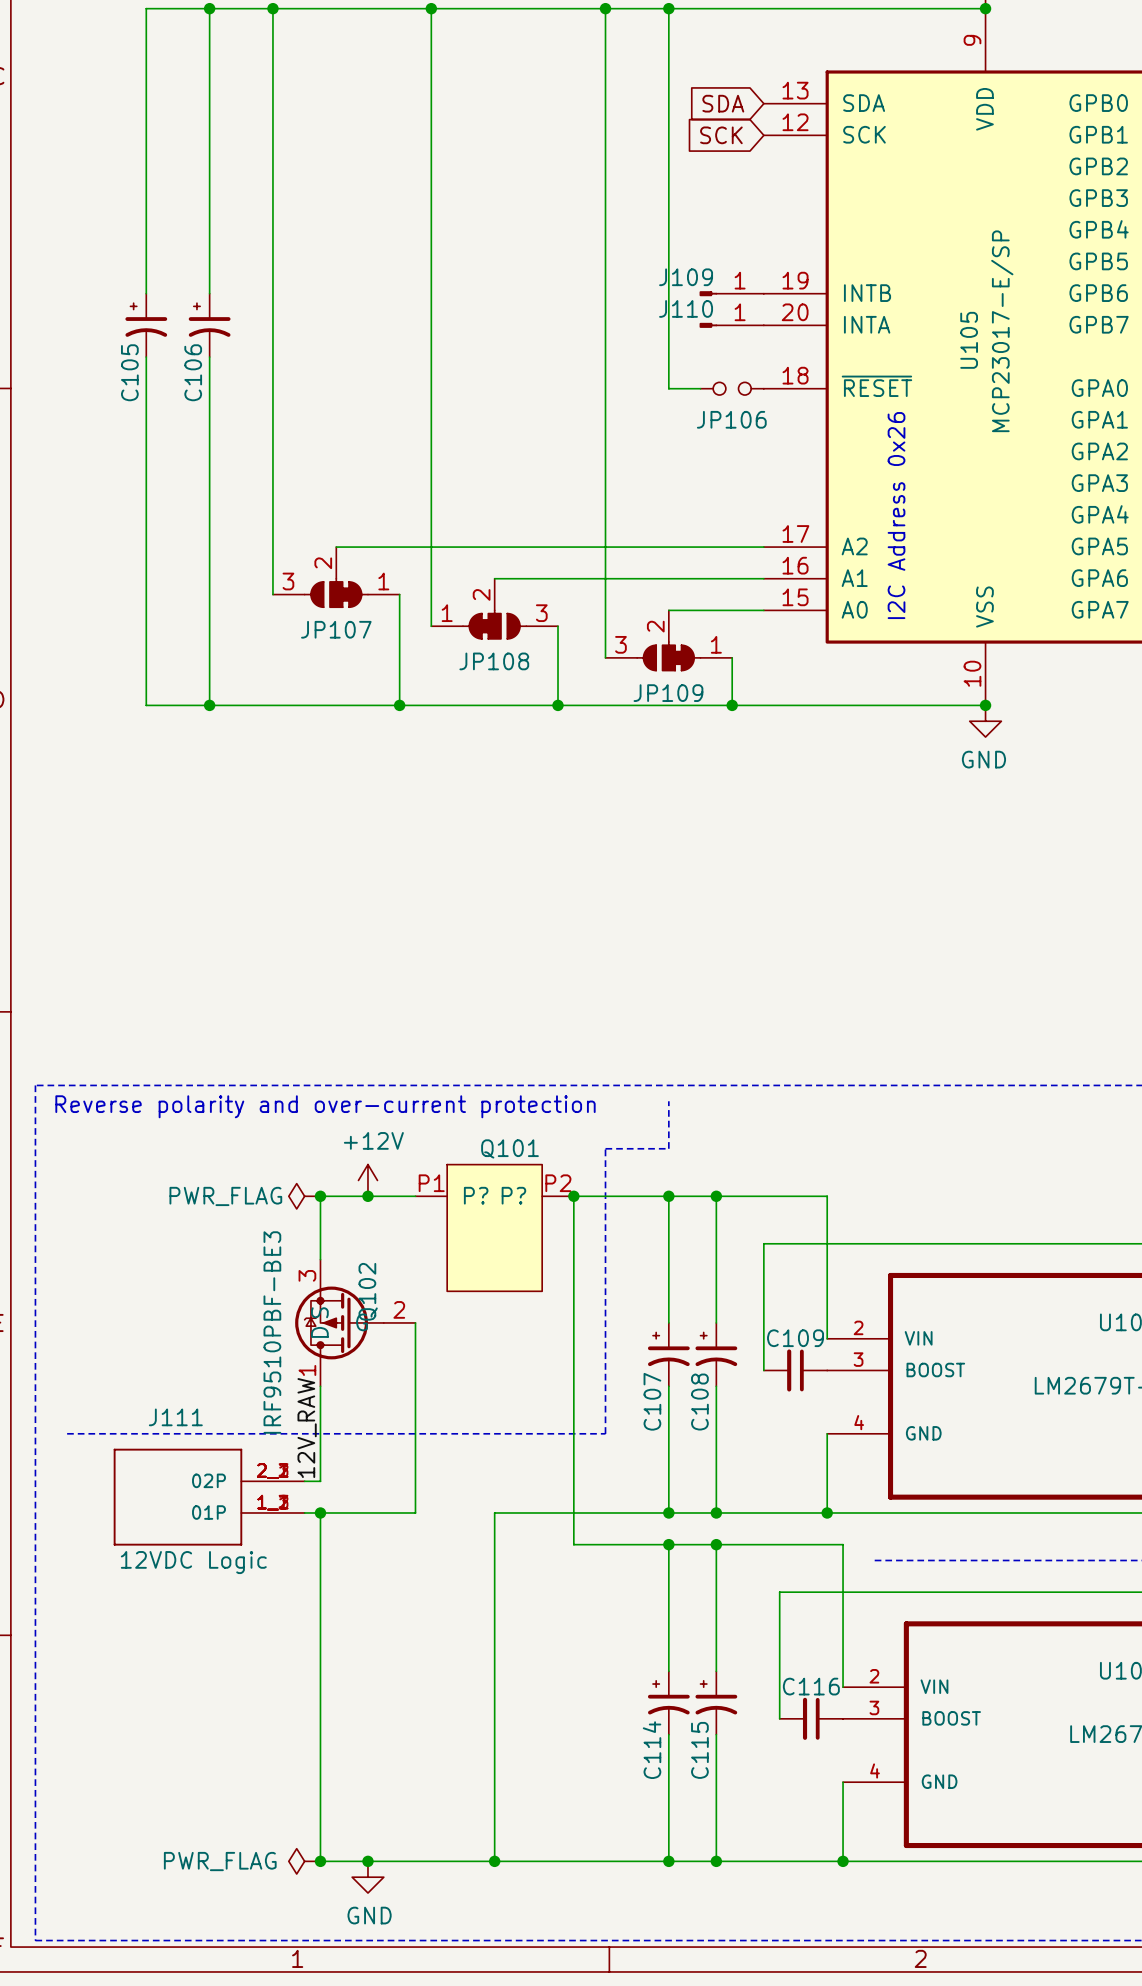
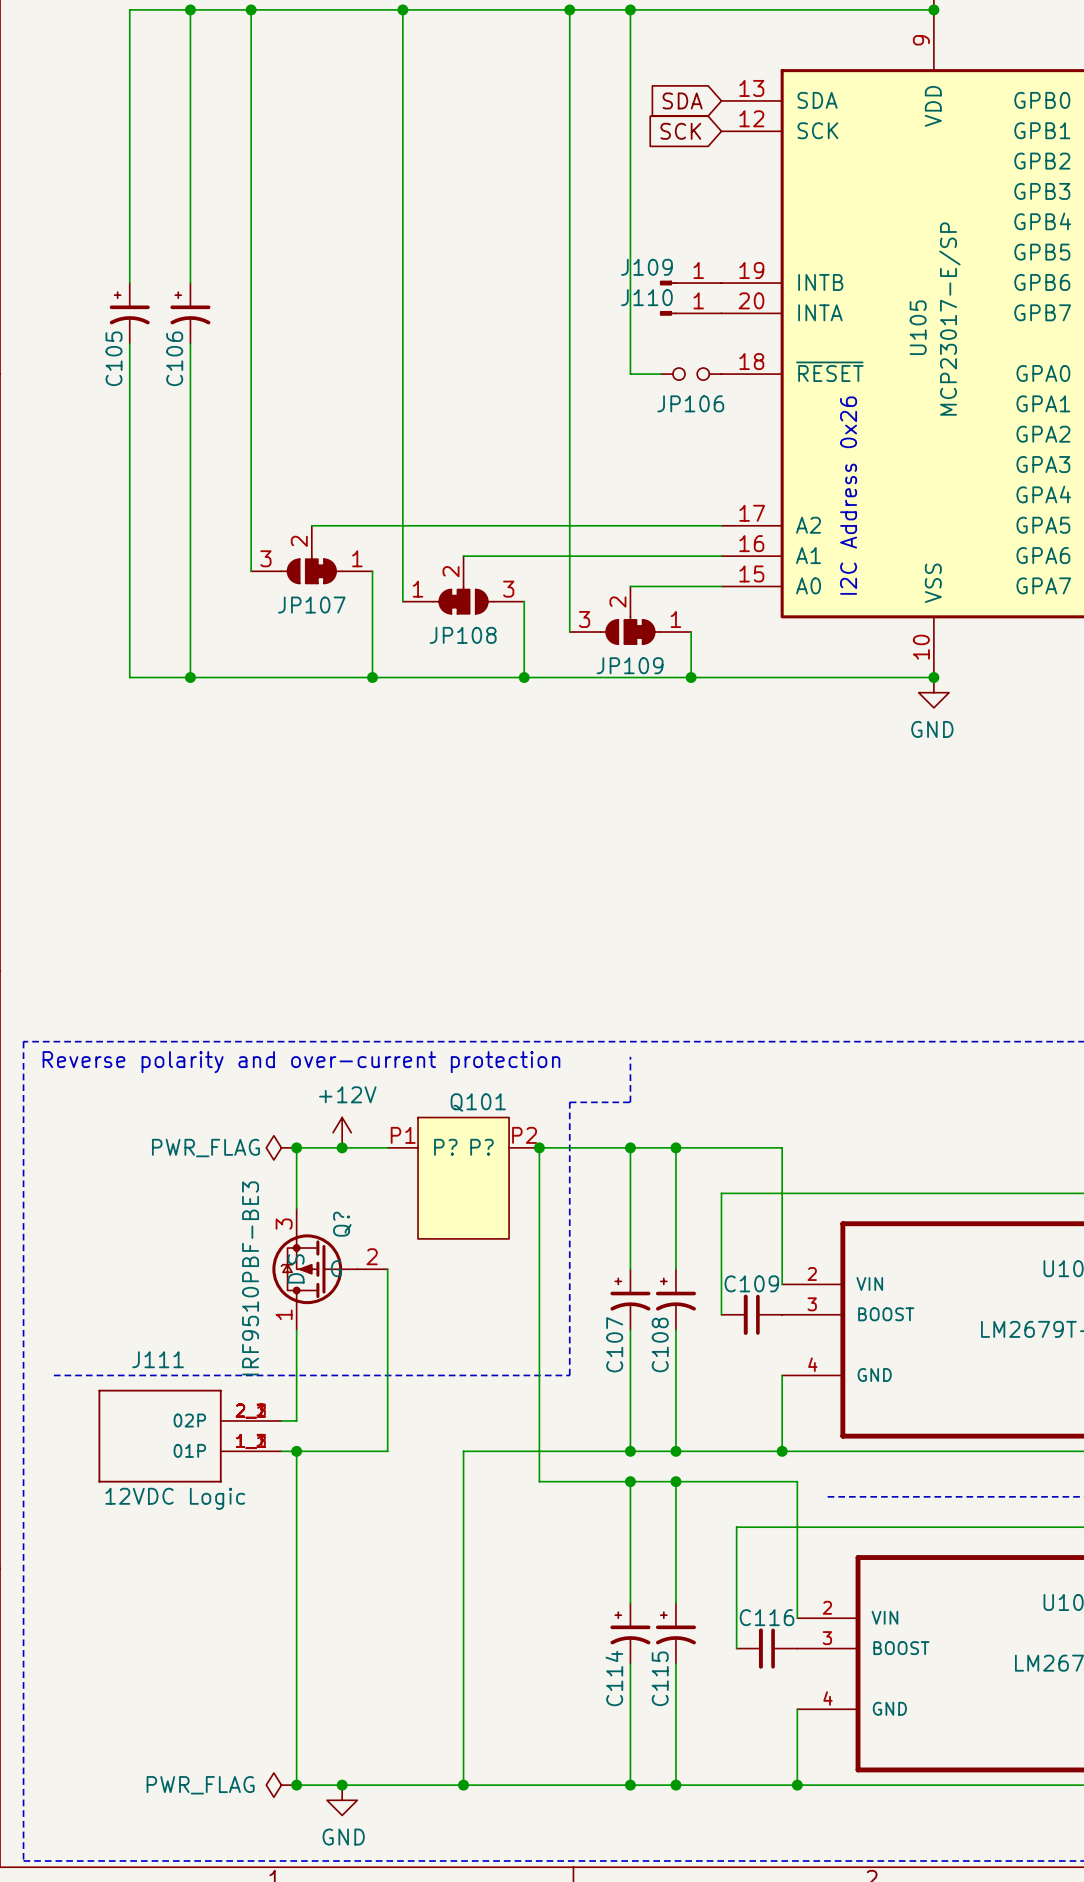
Q102 name: Q102 (368, 1291) -> Q? (342, 1224)
label: 12V_RAW (307, 1428) -> none

